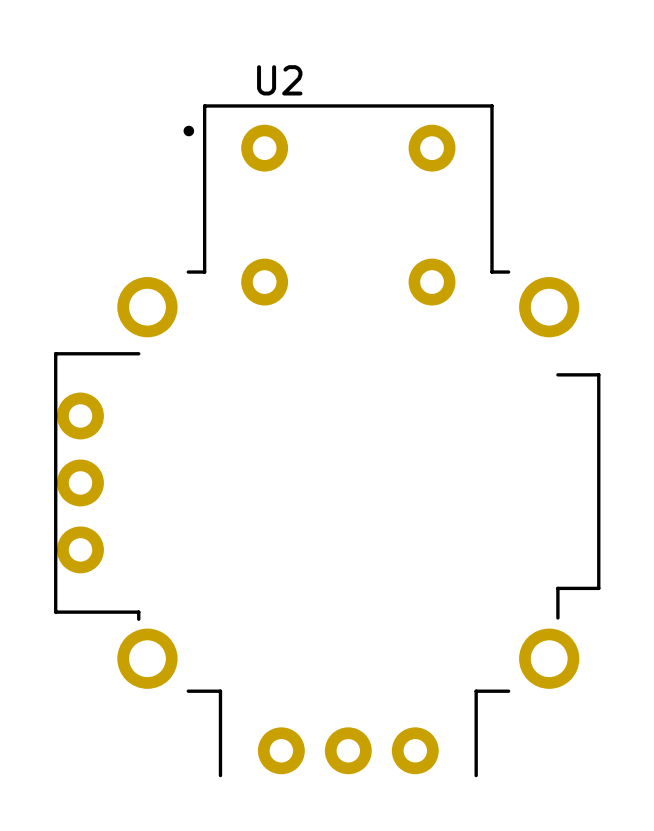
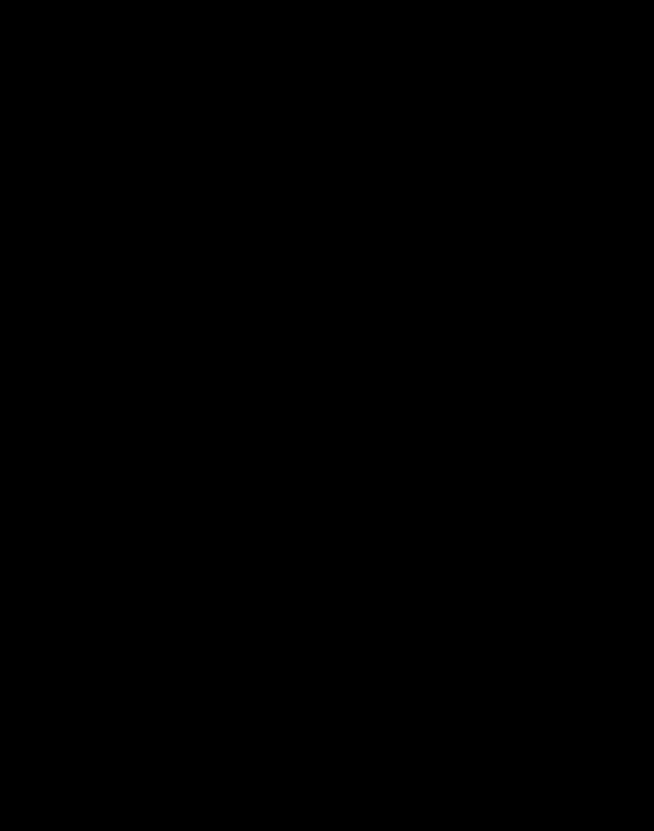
U2: (327, 440) -> none

